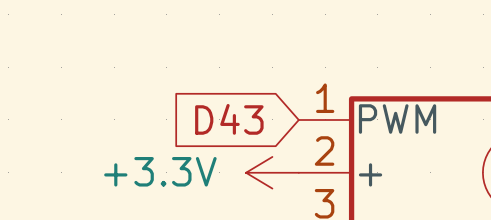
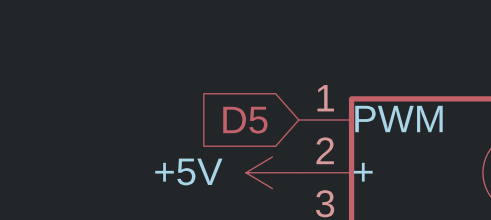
global label: D43 (229, 119) -> D5 (245, 120)
power symbol: +3.3V (272, 172) -> +5V (272, 172)

